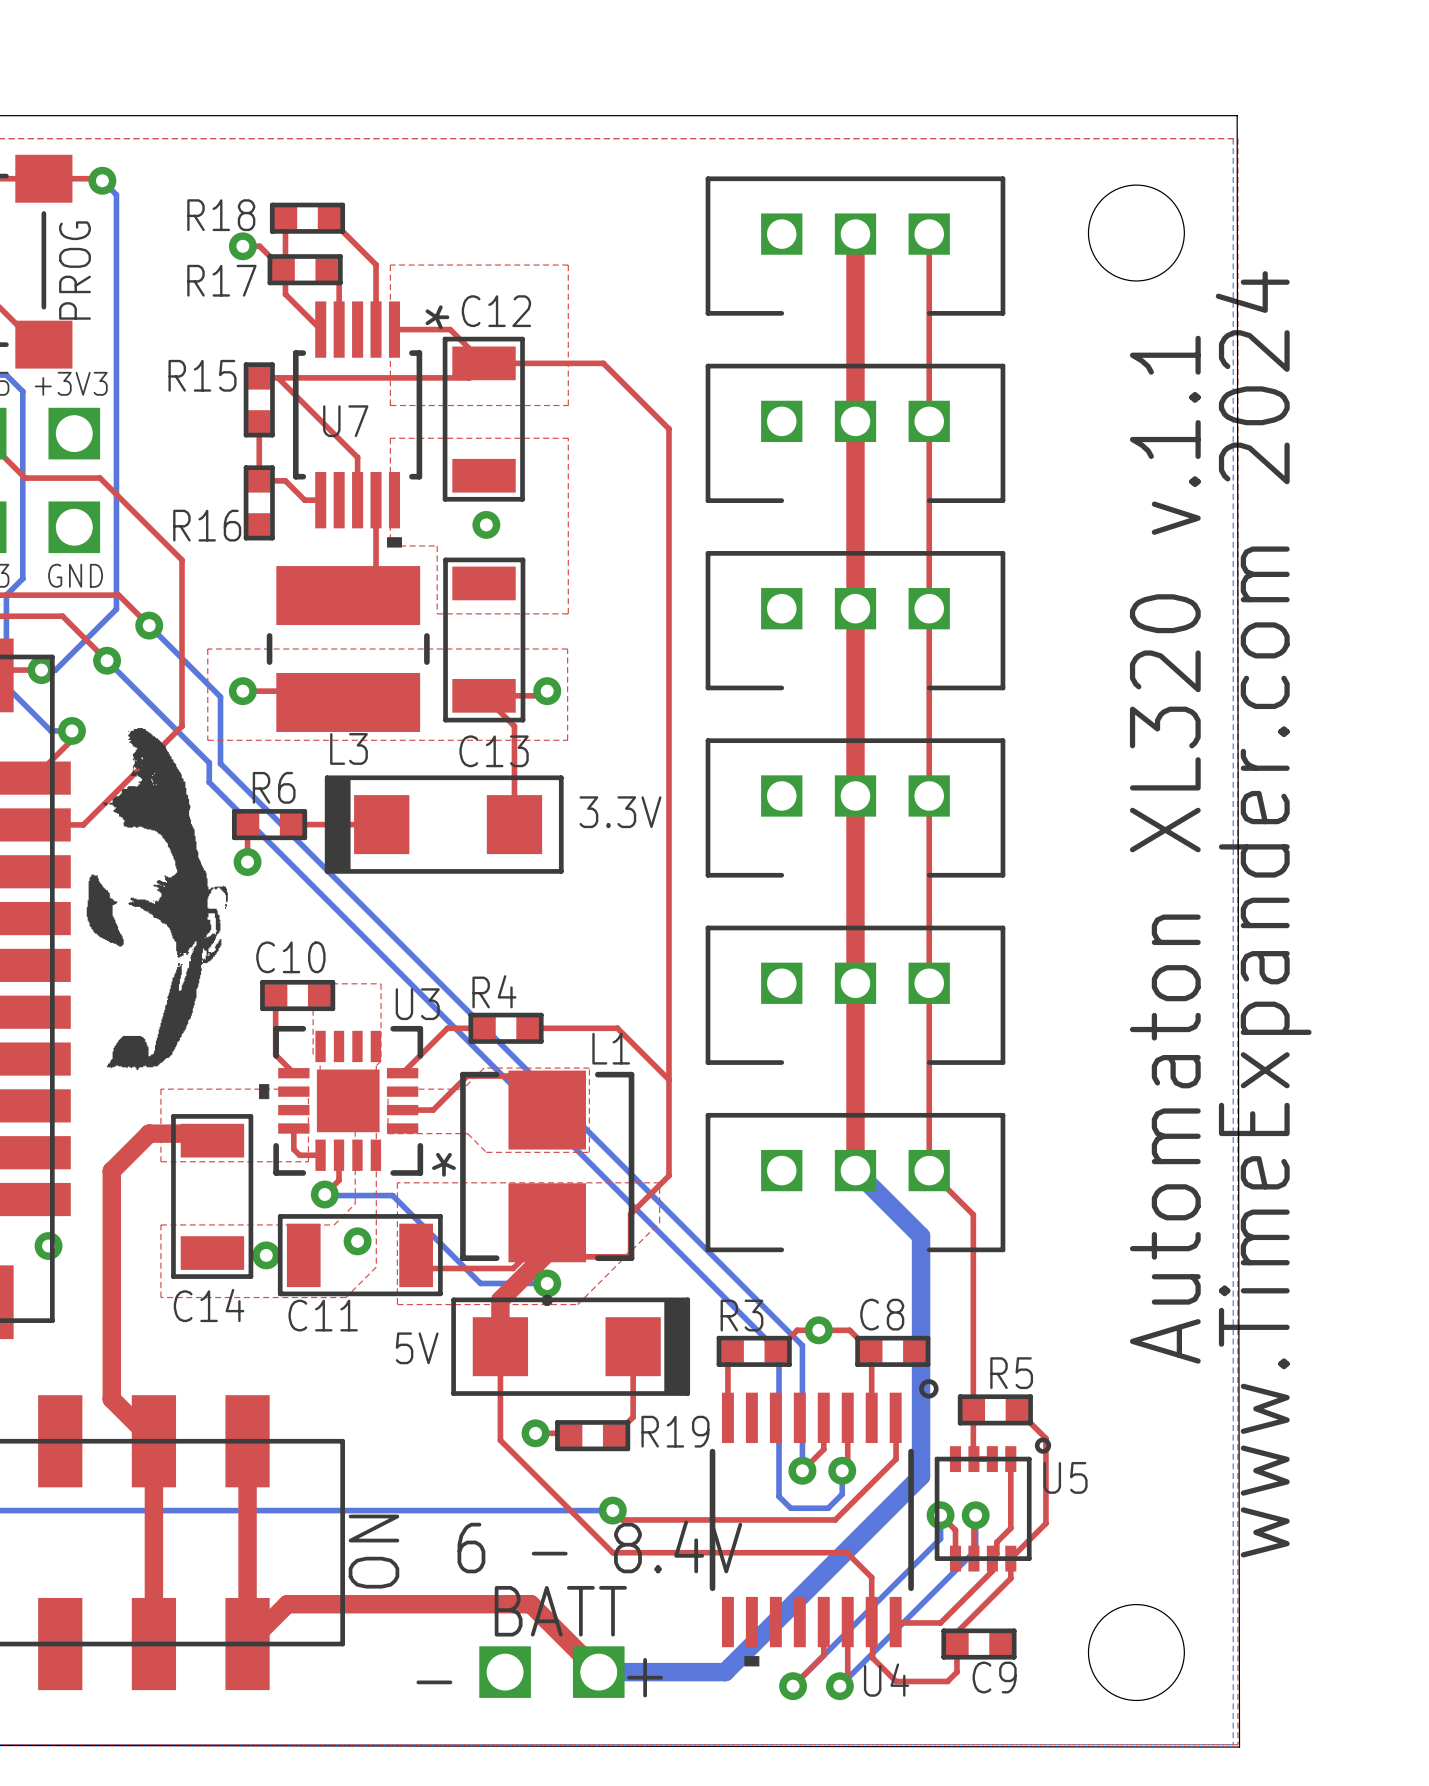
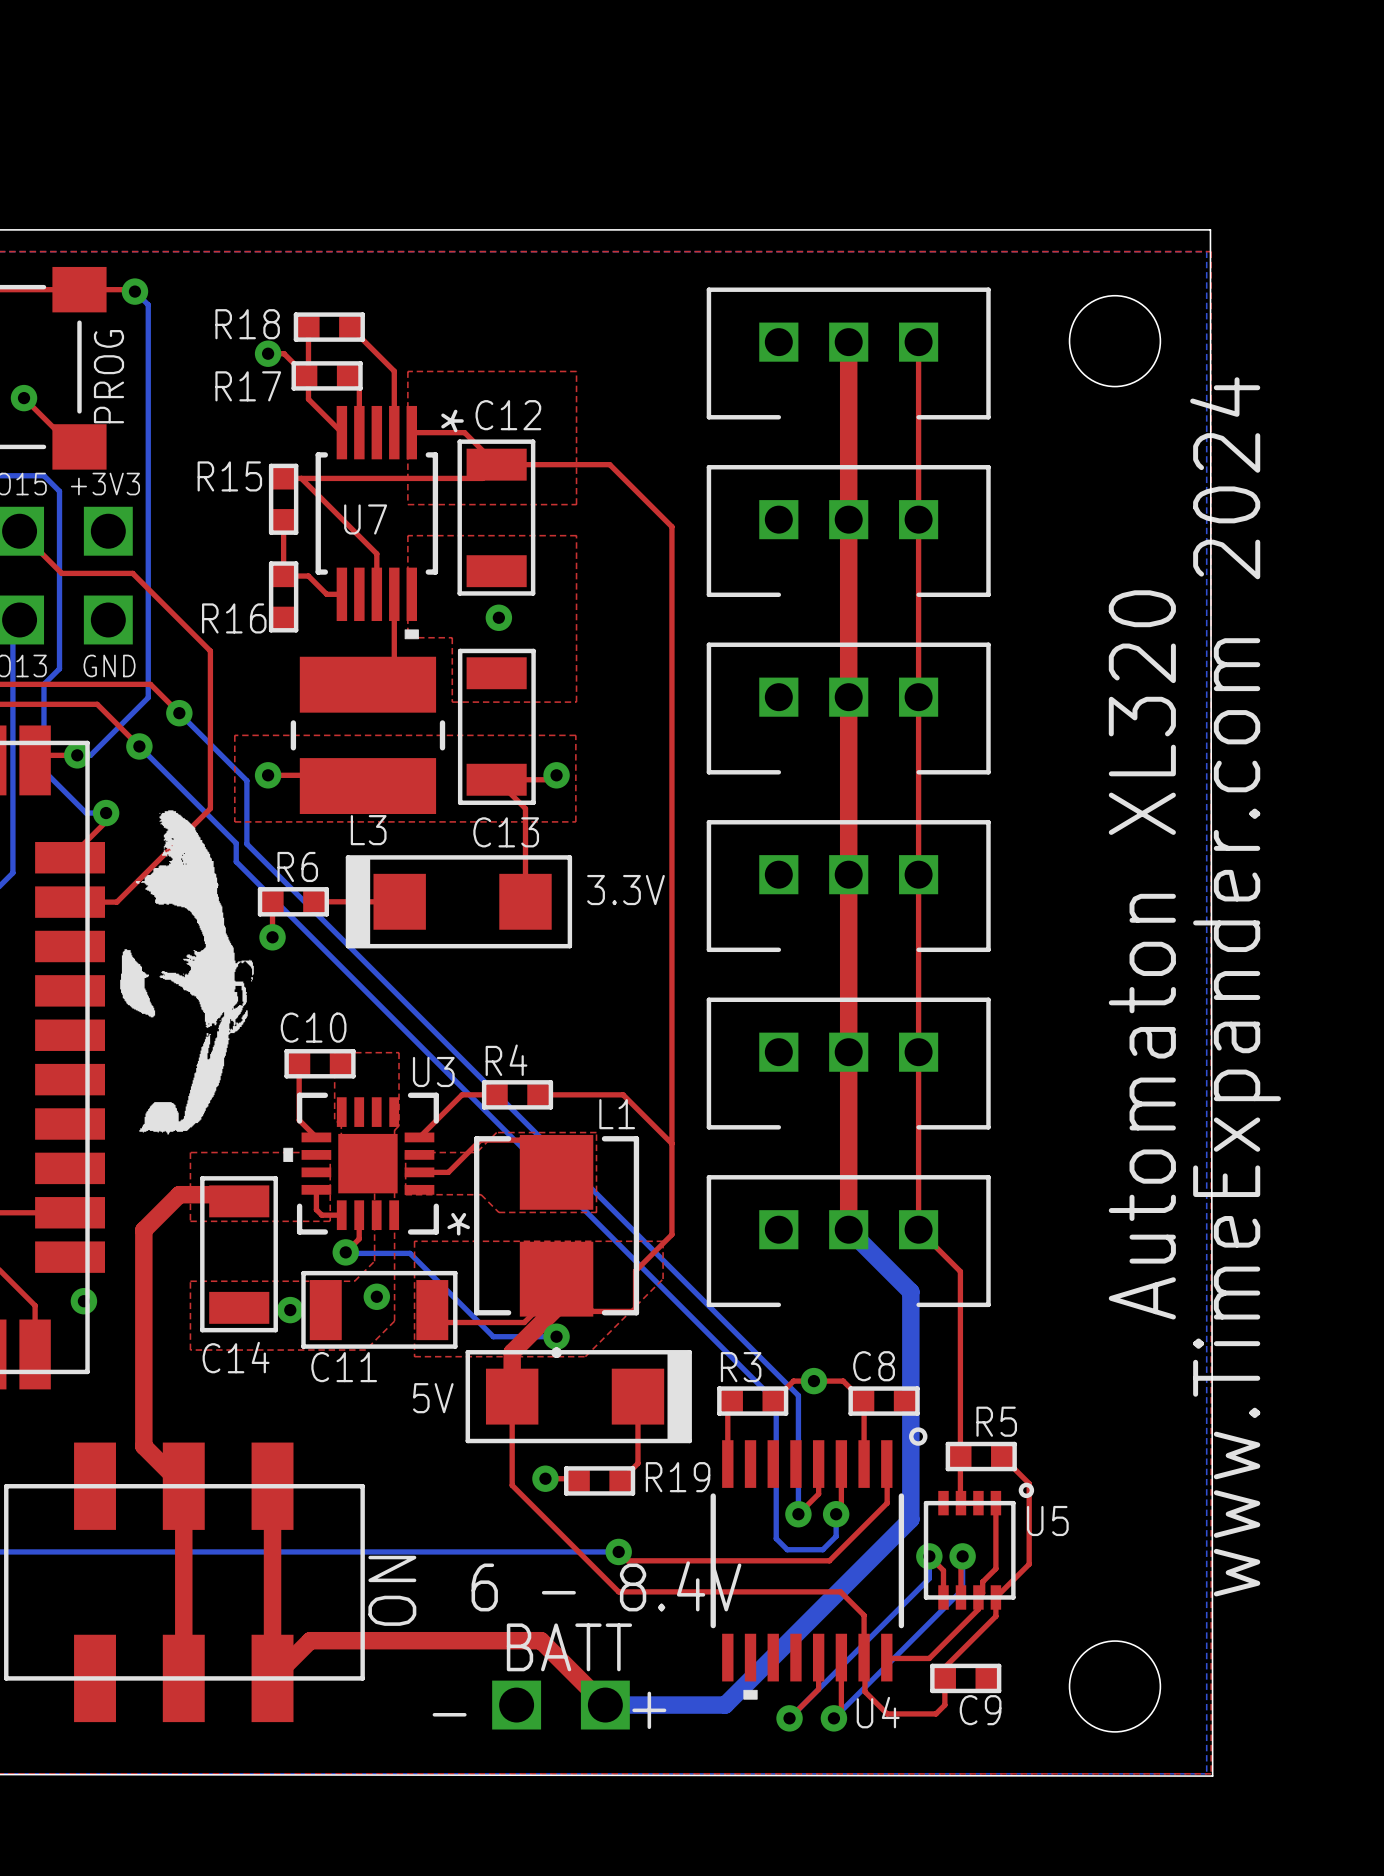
text: Automaton XL320 v.1.1 (1165, 849) -> Automaton XL320 (1142, 954)

